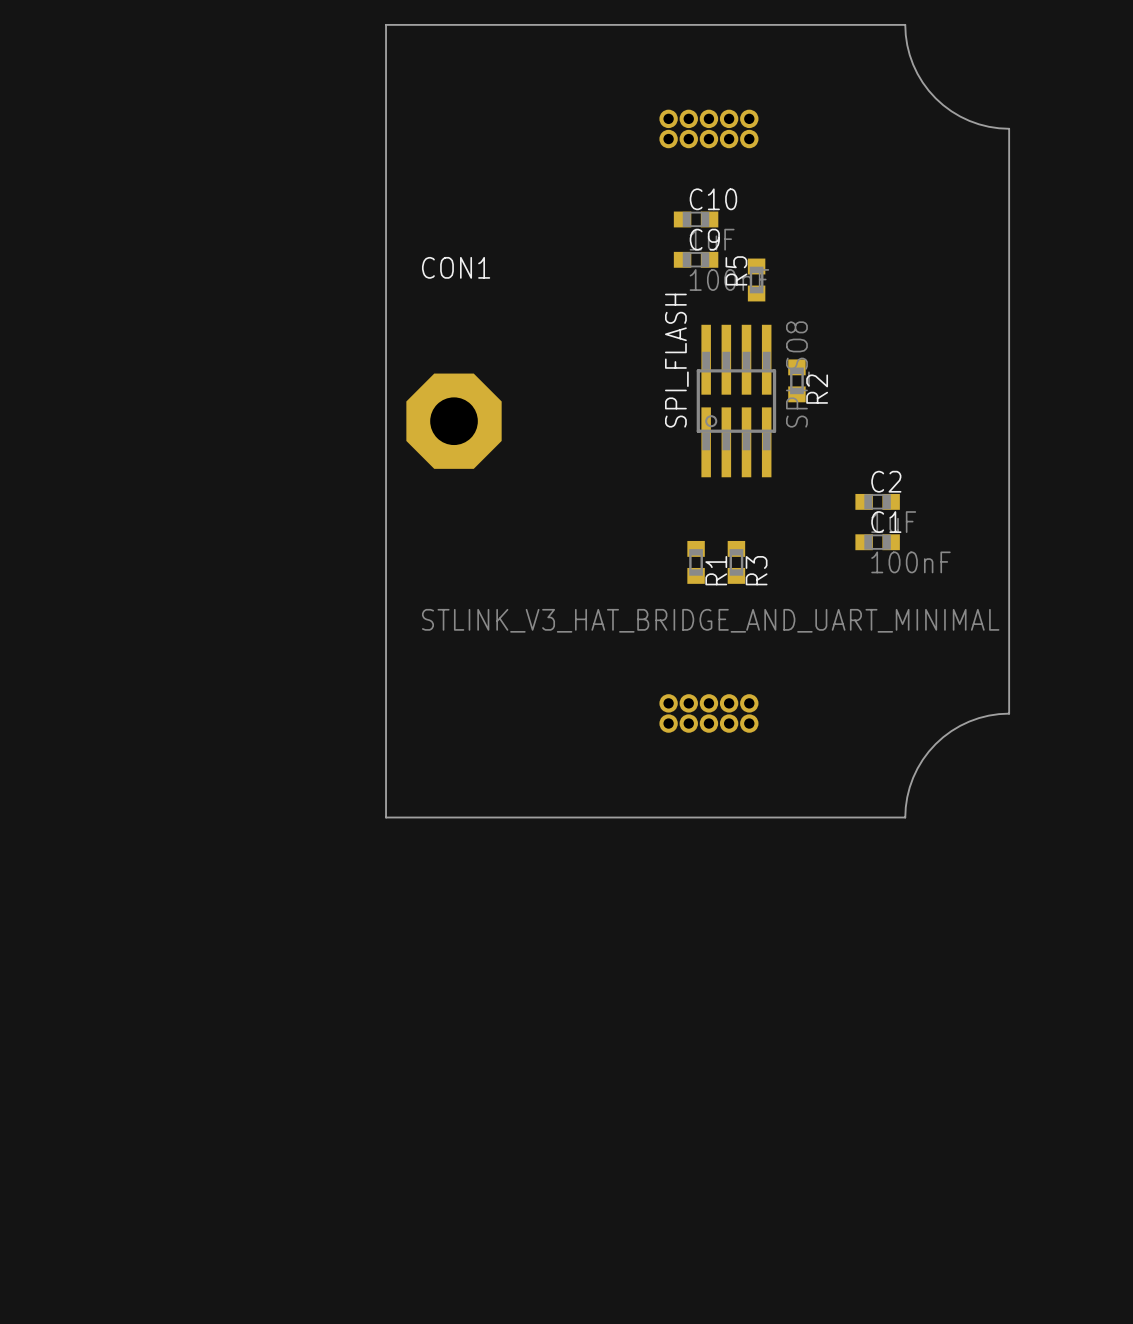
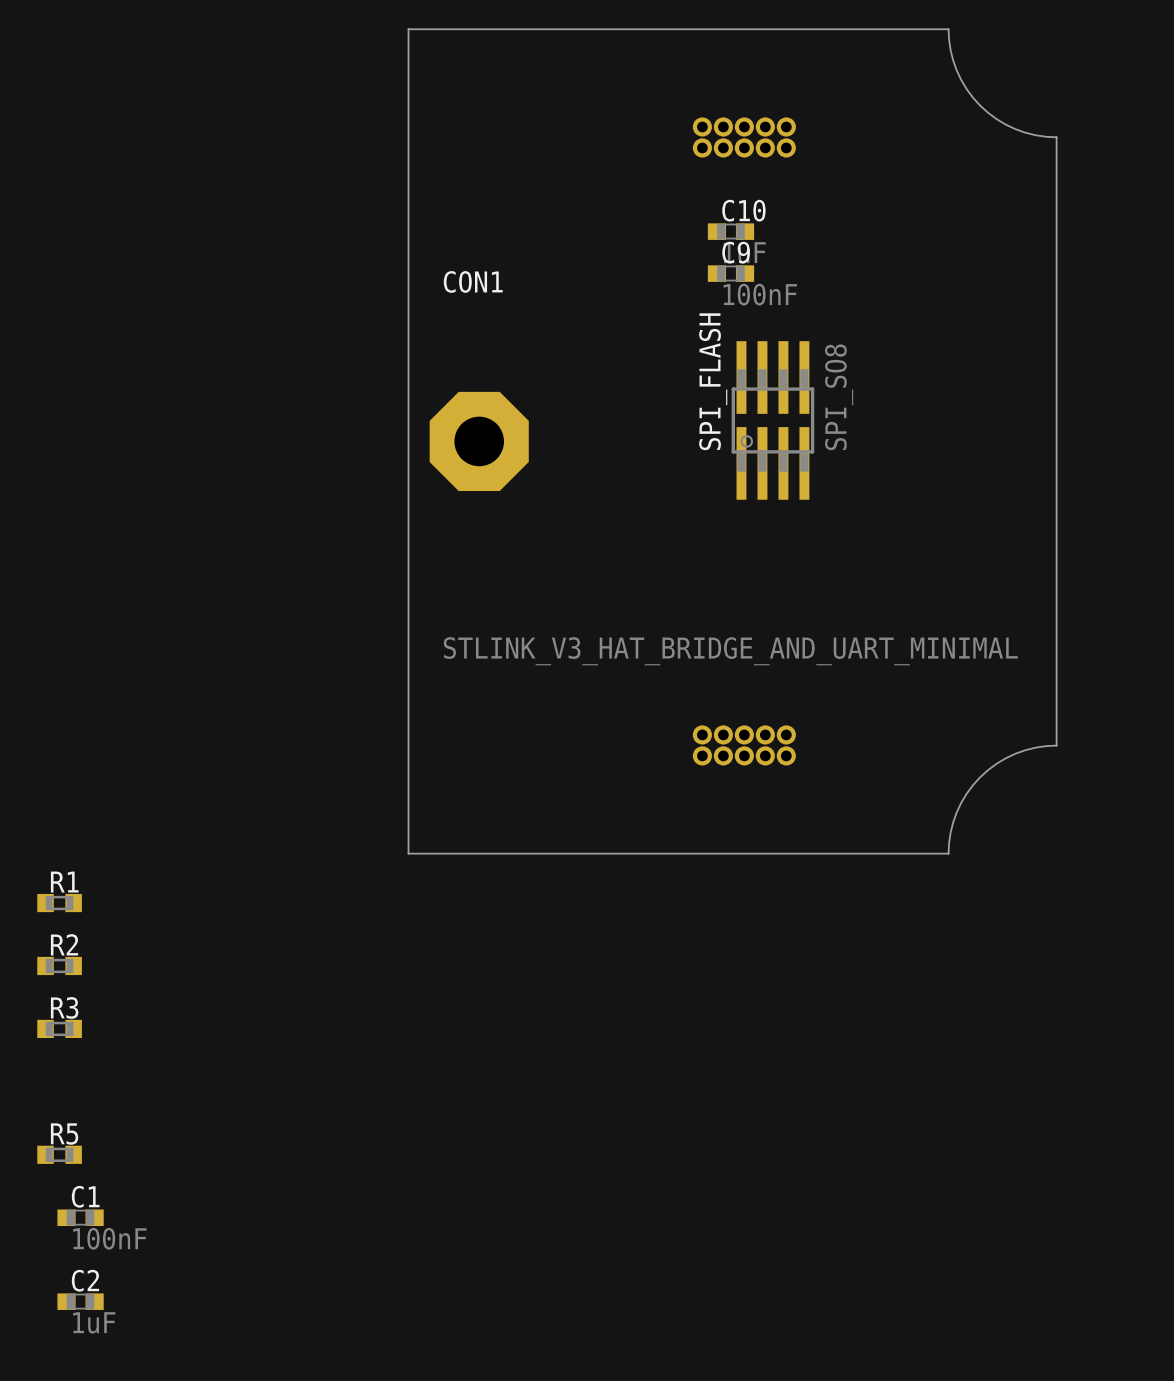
R5 rotation: 0° (756, 280) -> 90° clockwise (59, 1154)
R5 position: (756, 280) -> (59, 1154)
R2 rotation: 0° (796, 380) -> 90° clockwise (59, 965)
R2 position: (796, 380) -> (59, 965)
R2 name position: R2 (817, 389) -> R2 (64, 944)
C2 position: (877, 501) -> (80, 1301)
C1 position: (877, 542) -> (80, 1217)
R1 rotation: 0° (696, 562) -> 90° clockwise (59, 903)
R1 position: (696, 562) -> (59, 903)
R3 rotation: 0° (736, 562) -> 90° clockwise (59, 1028)
R3 position: (736, 562) -> (59, 1028)
R1 name position: R1 (716, 570) -> R1 (64, 882)
R3 name position: R3 (756, 570) -> R3 (64, 1007)

